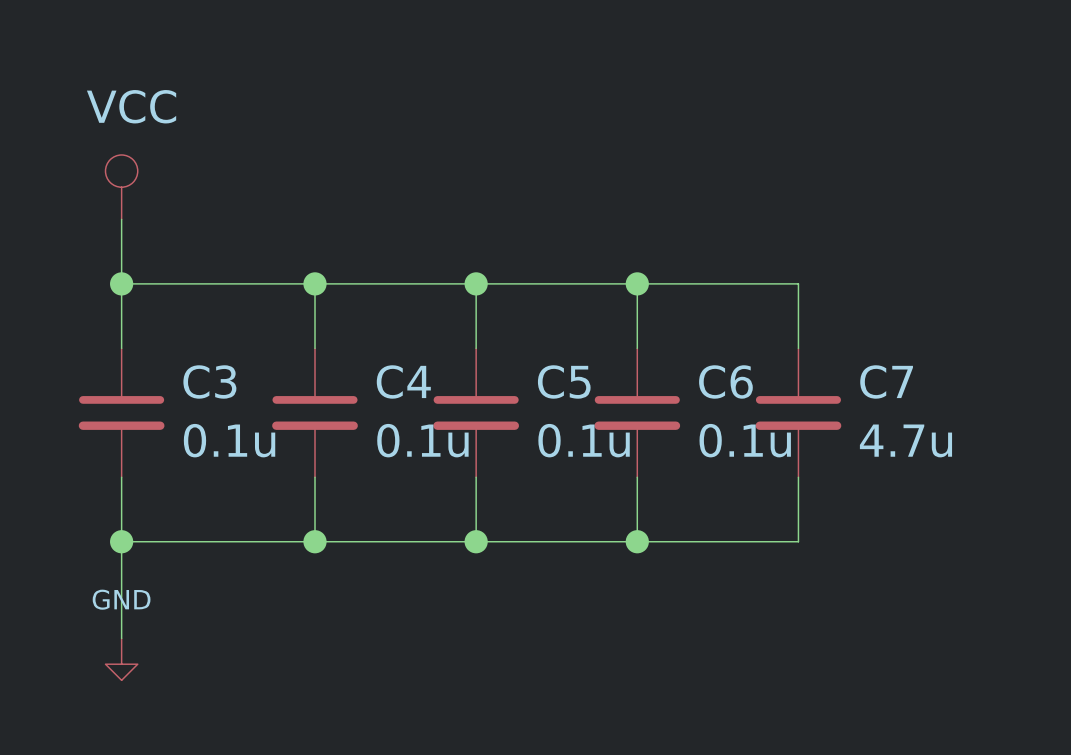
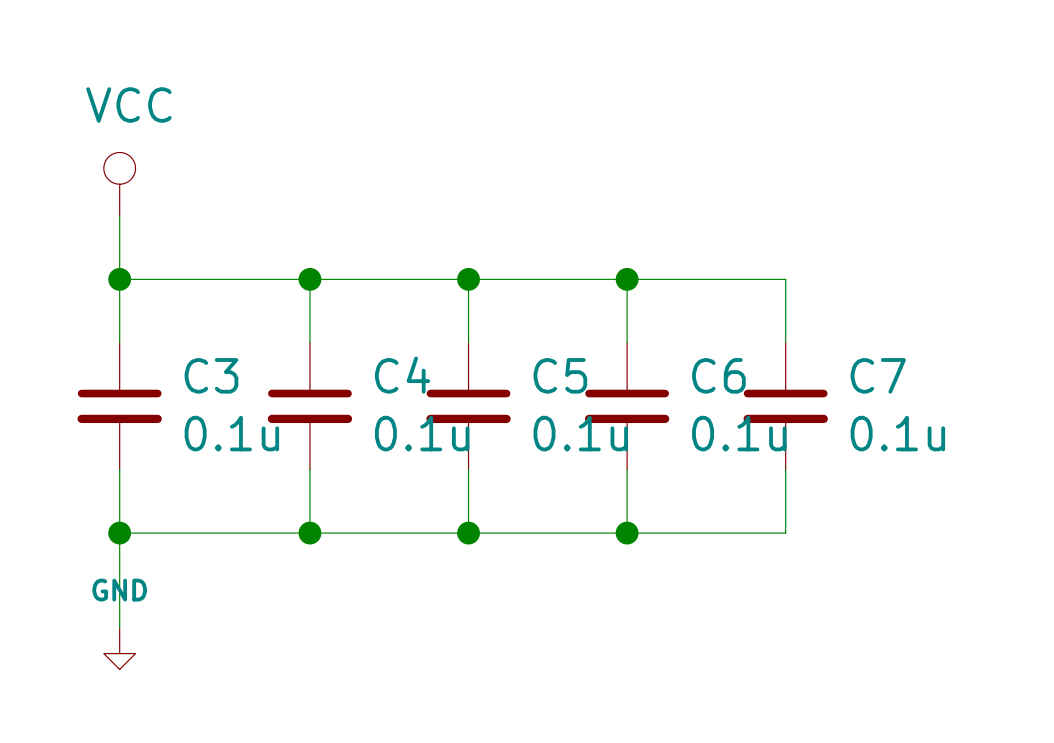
C7 value: 4.7u (905, 440) -> 0.1u (897, 433)

